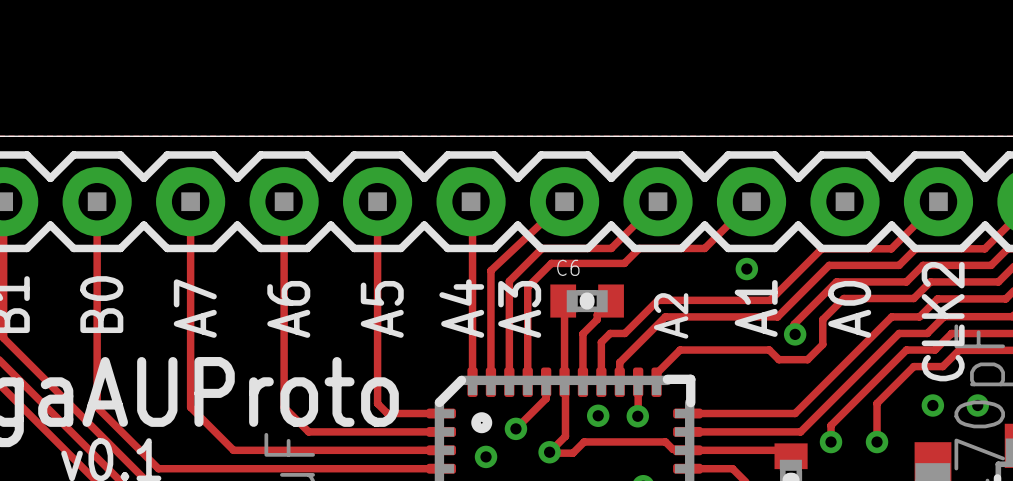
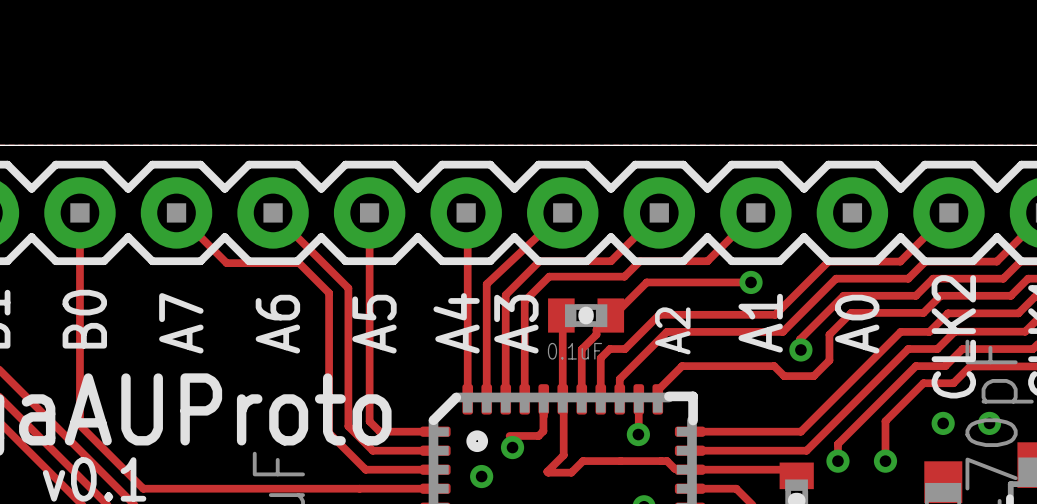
track: (190, 201) (190, 407) (233, 450) (373, 450) -> (176, 212) (226, 263) (299, 263) (329, 293) (329, 433) (365, 469)
track: (284, 201) (284, 407) (308, 431) (380, 431) -> (273, 212) (348, 288) (348, 426) (372, 450)
C6 name: C6 (568, 267) -> none
track: none -> (751, 282) (646, 282) (613, 315) (610, 315)
C6 value: none -> 0.1uF (574, 351)
track: none -> (543, 403) (543, 431) (538, 435) (509, 435)
track: (546, 398) (515, 428) -> none
via: (598, 415) -> none
via: (549, 452) -> none

